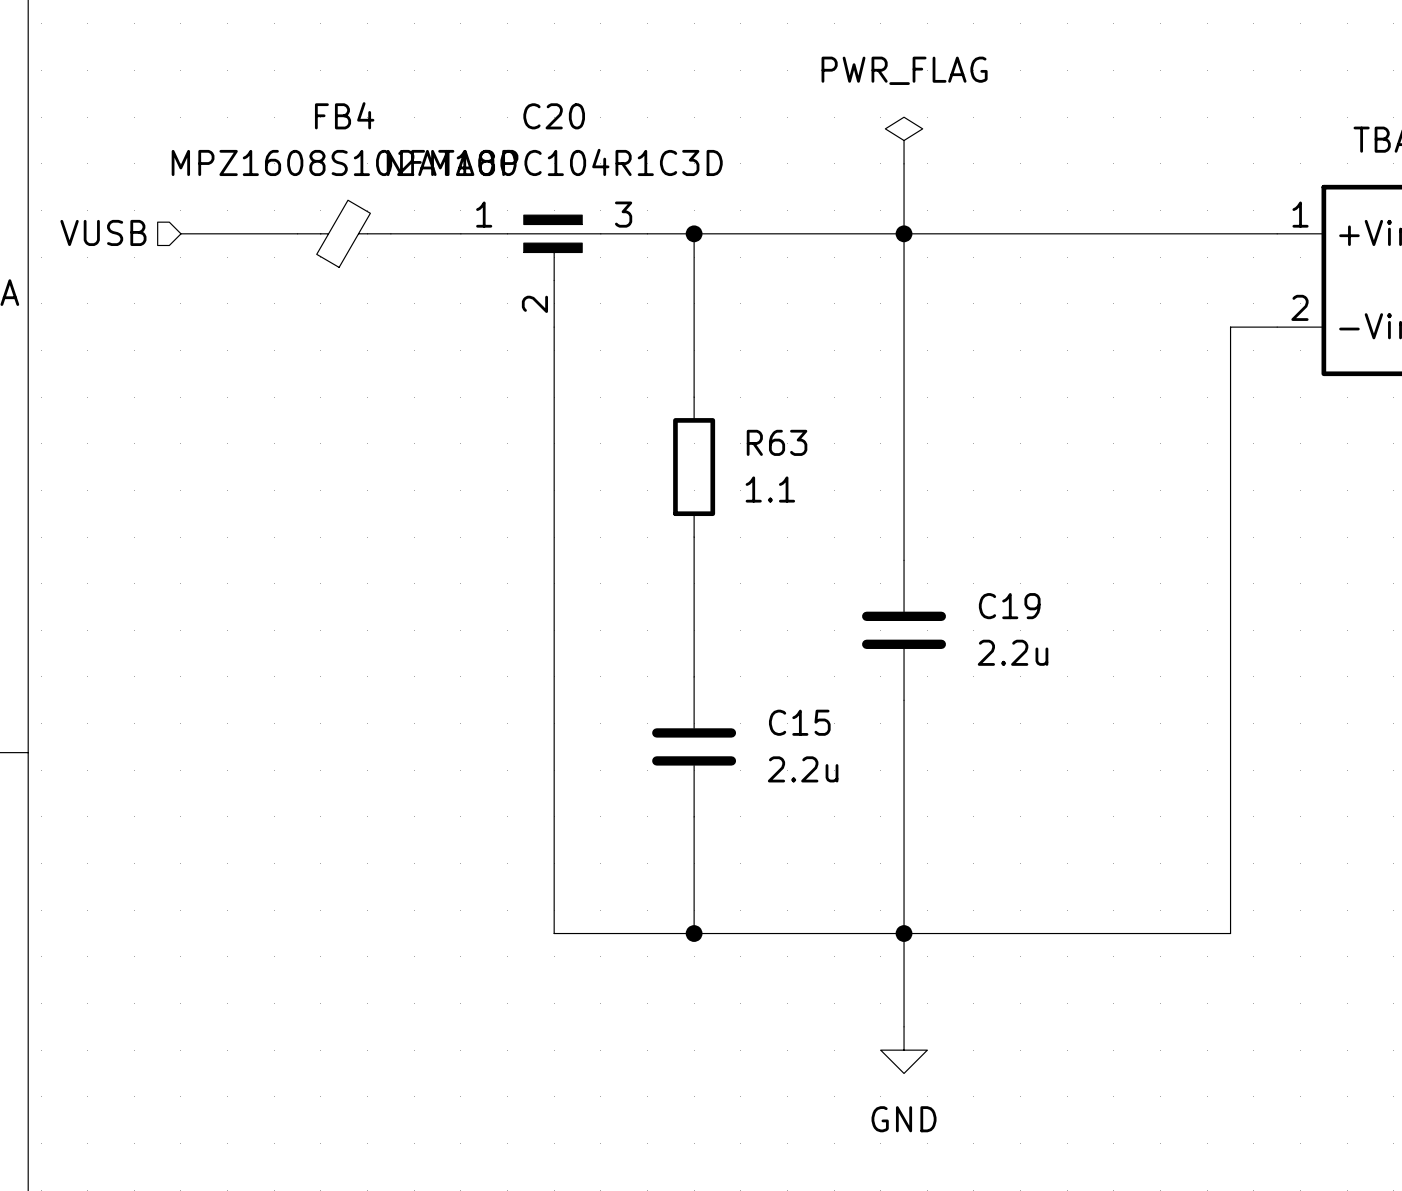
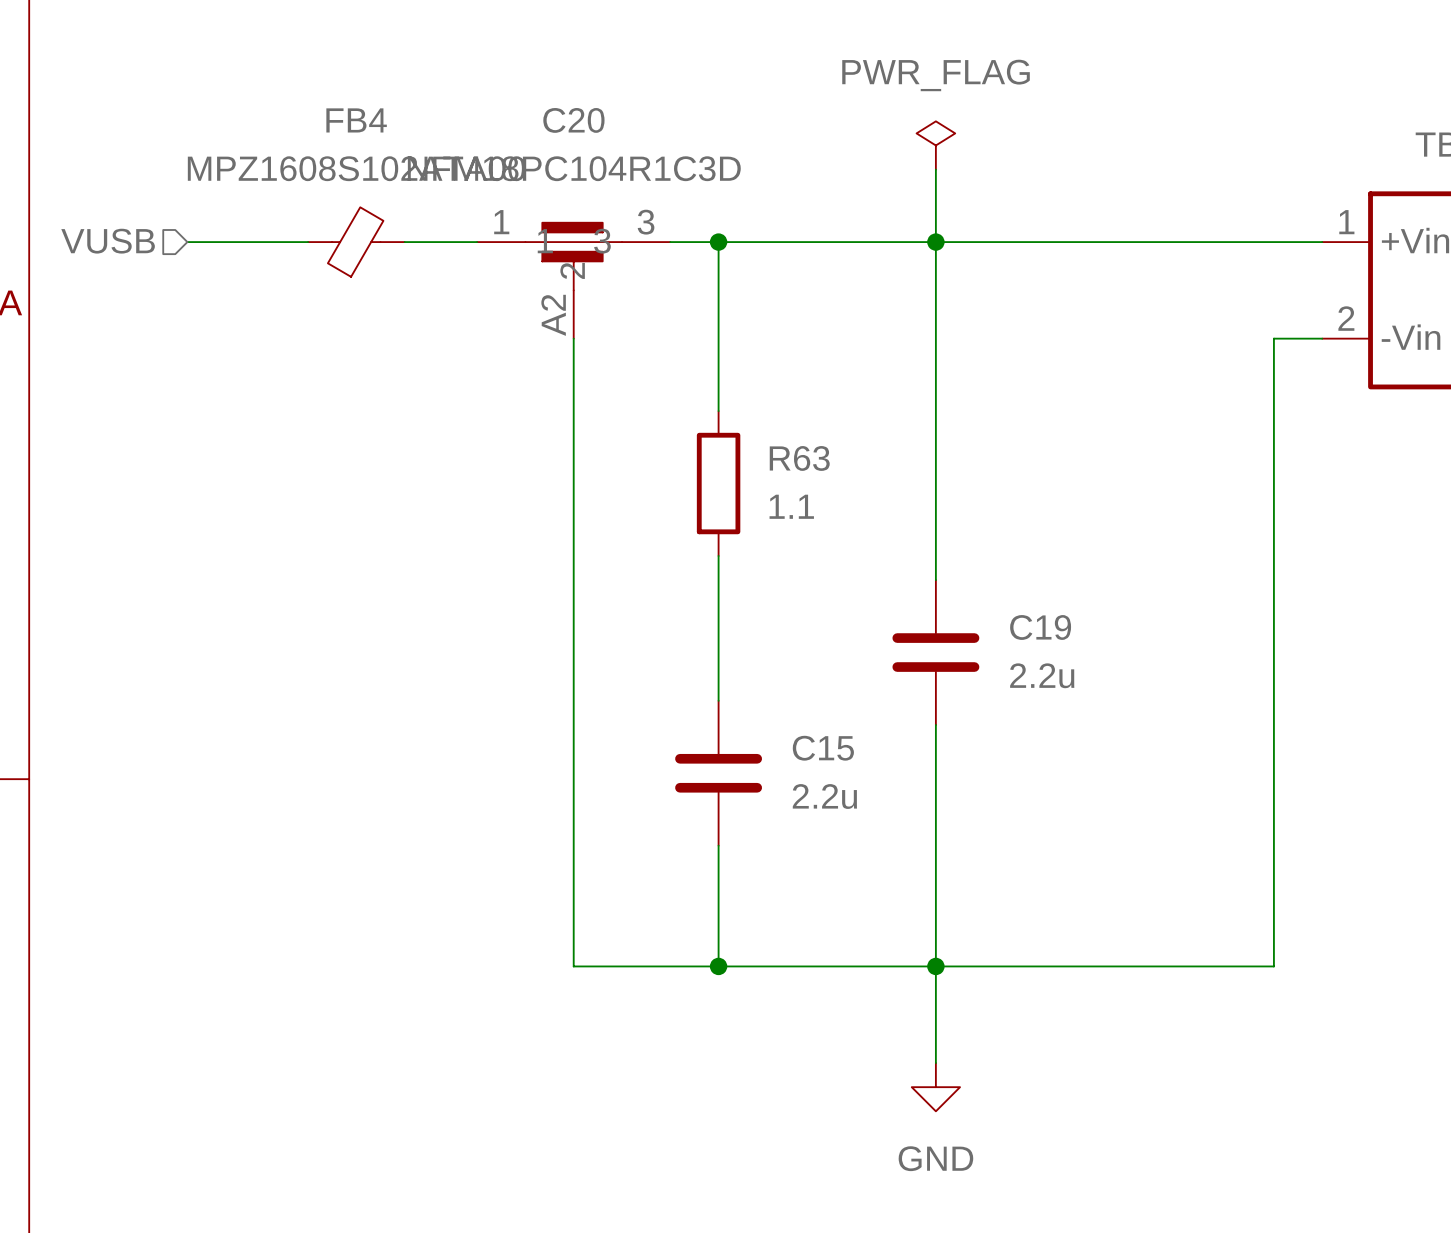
C20 pin name: none -> 1 (545, 241)
C20 pin name: none -> 3 (602, 241)
C20 pin name: none -> 2 (572, 270)
C20 pin number: 2 (534, 304) -> A2 (553, 315)

